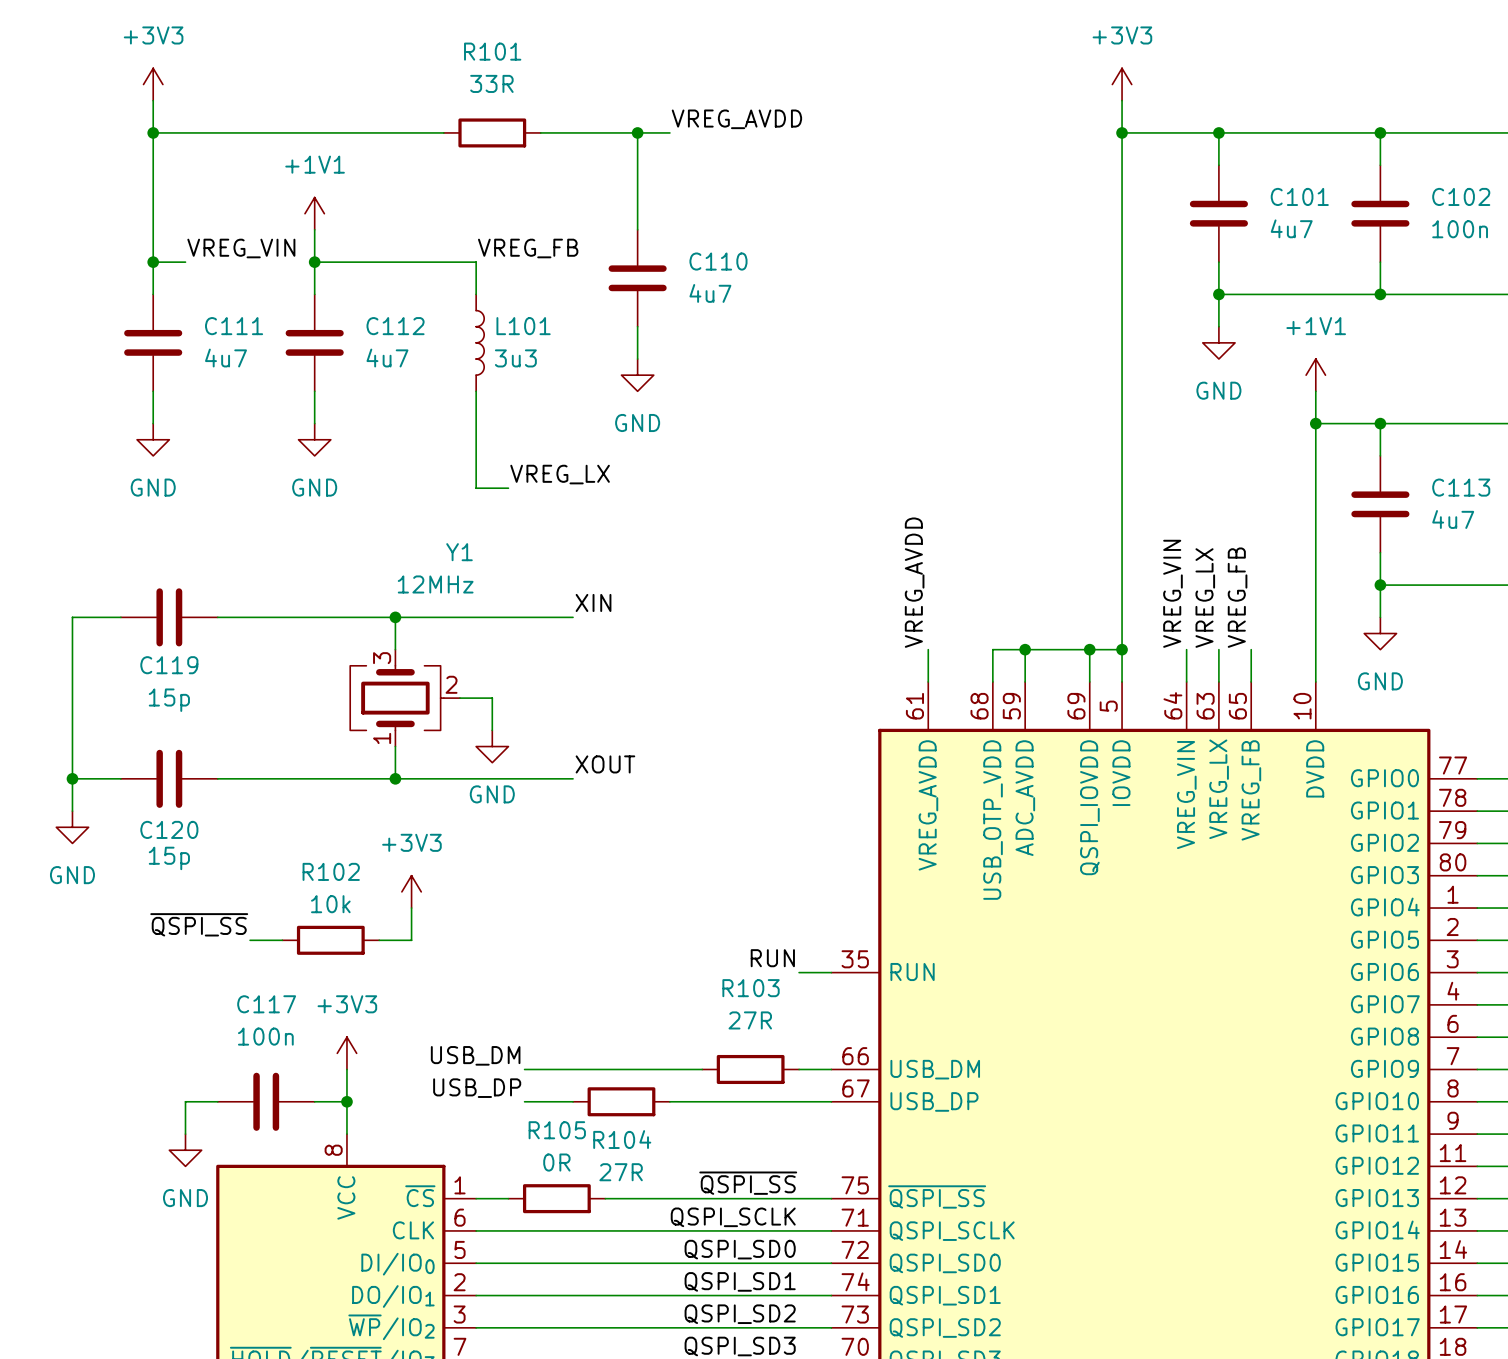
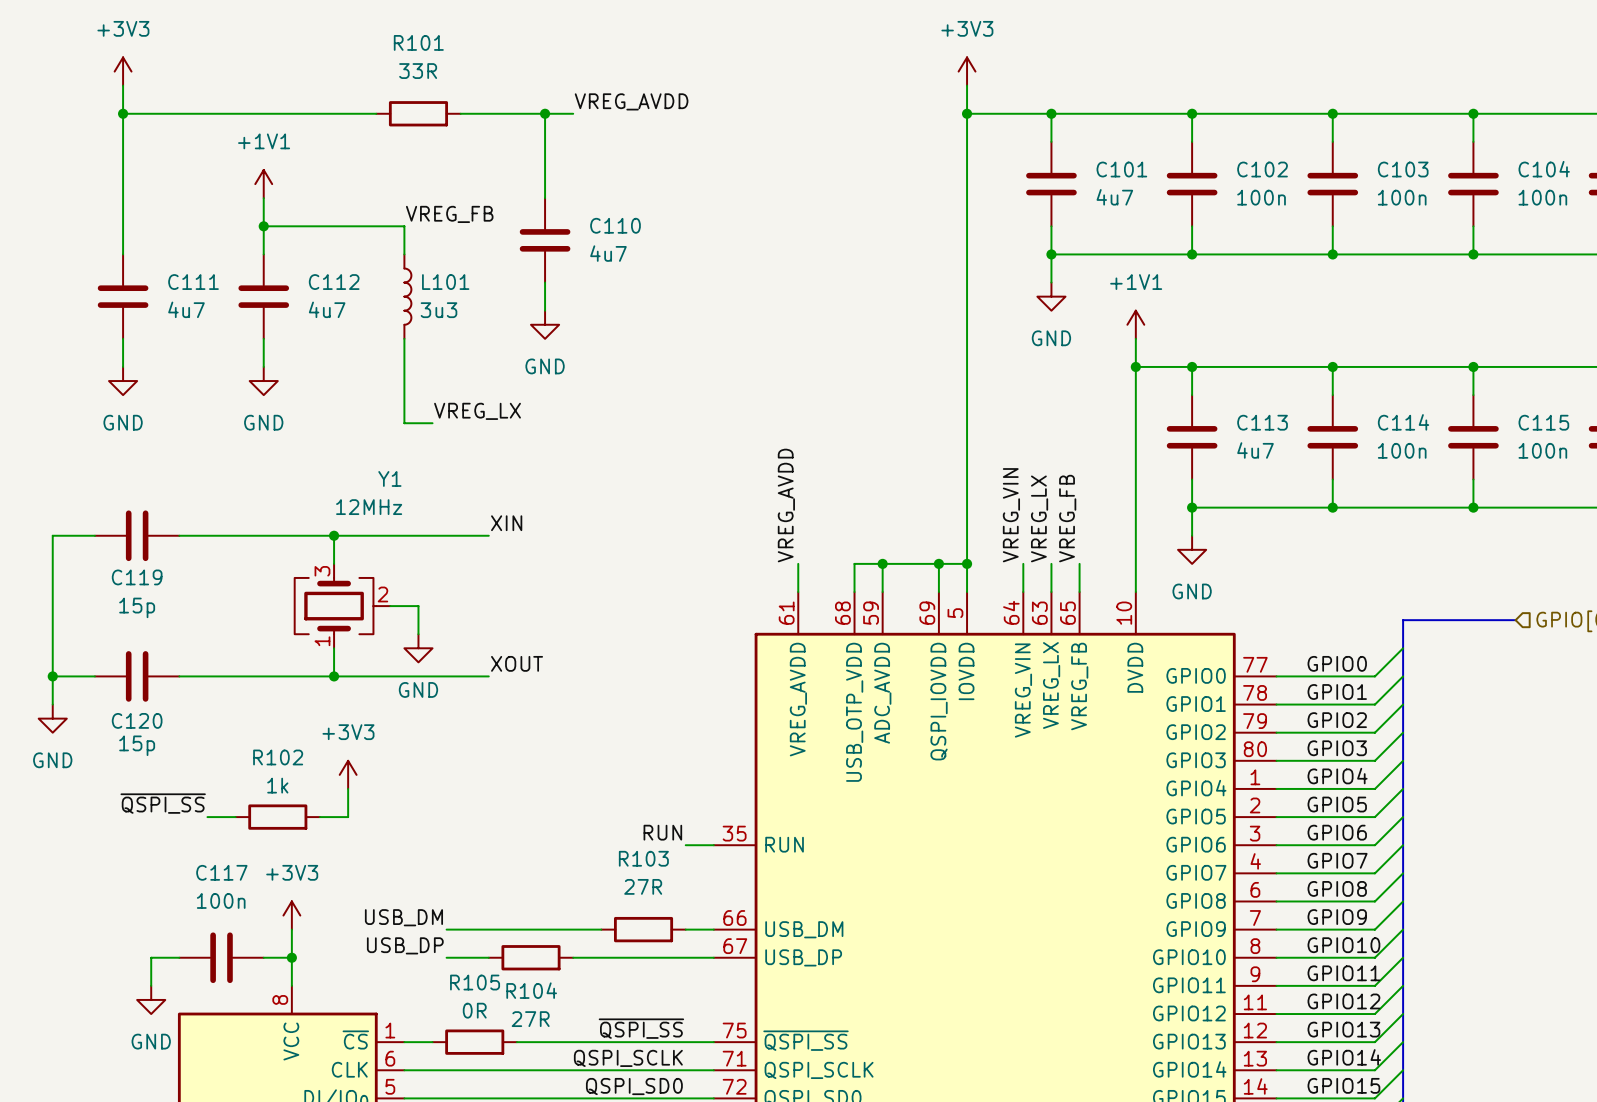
label: VREG_VIN (241, 248) -> none
wire: (153, 262) (185, 262) -> none
junction: (153, 262) -> none
R102 value: 10k (330, 904) -> 1k (277, 785)

